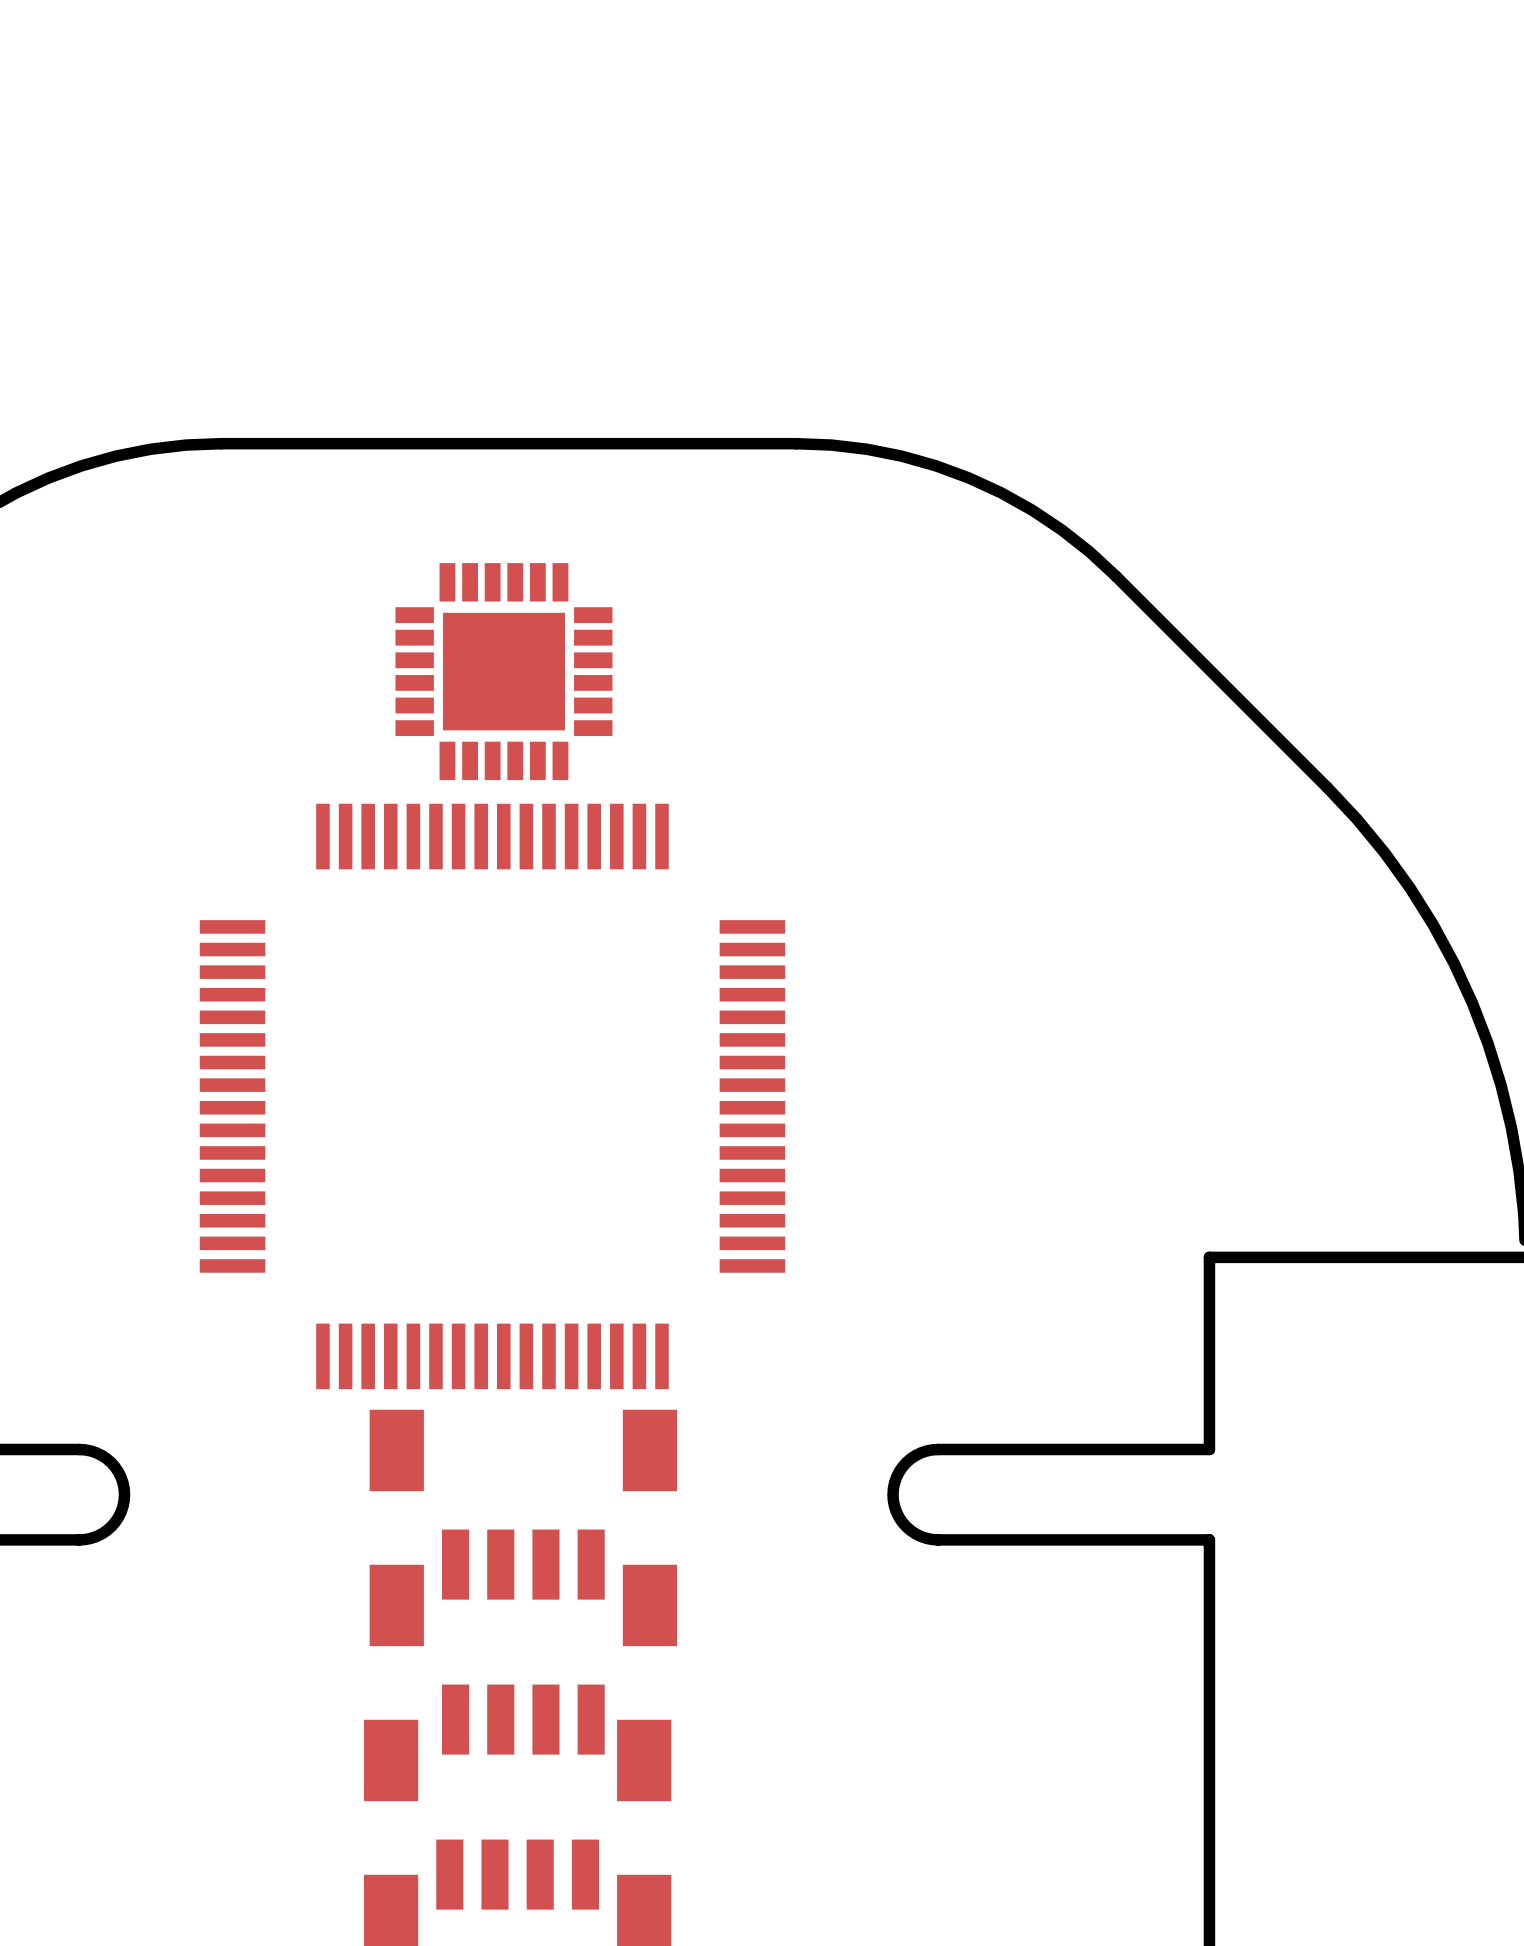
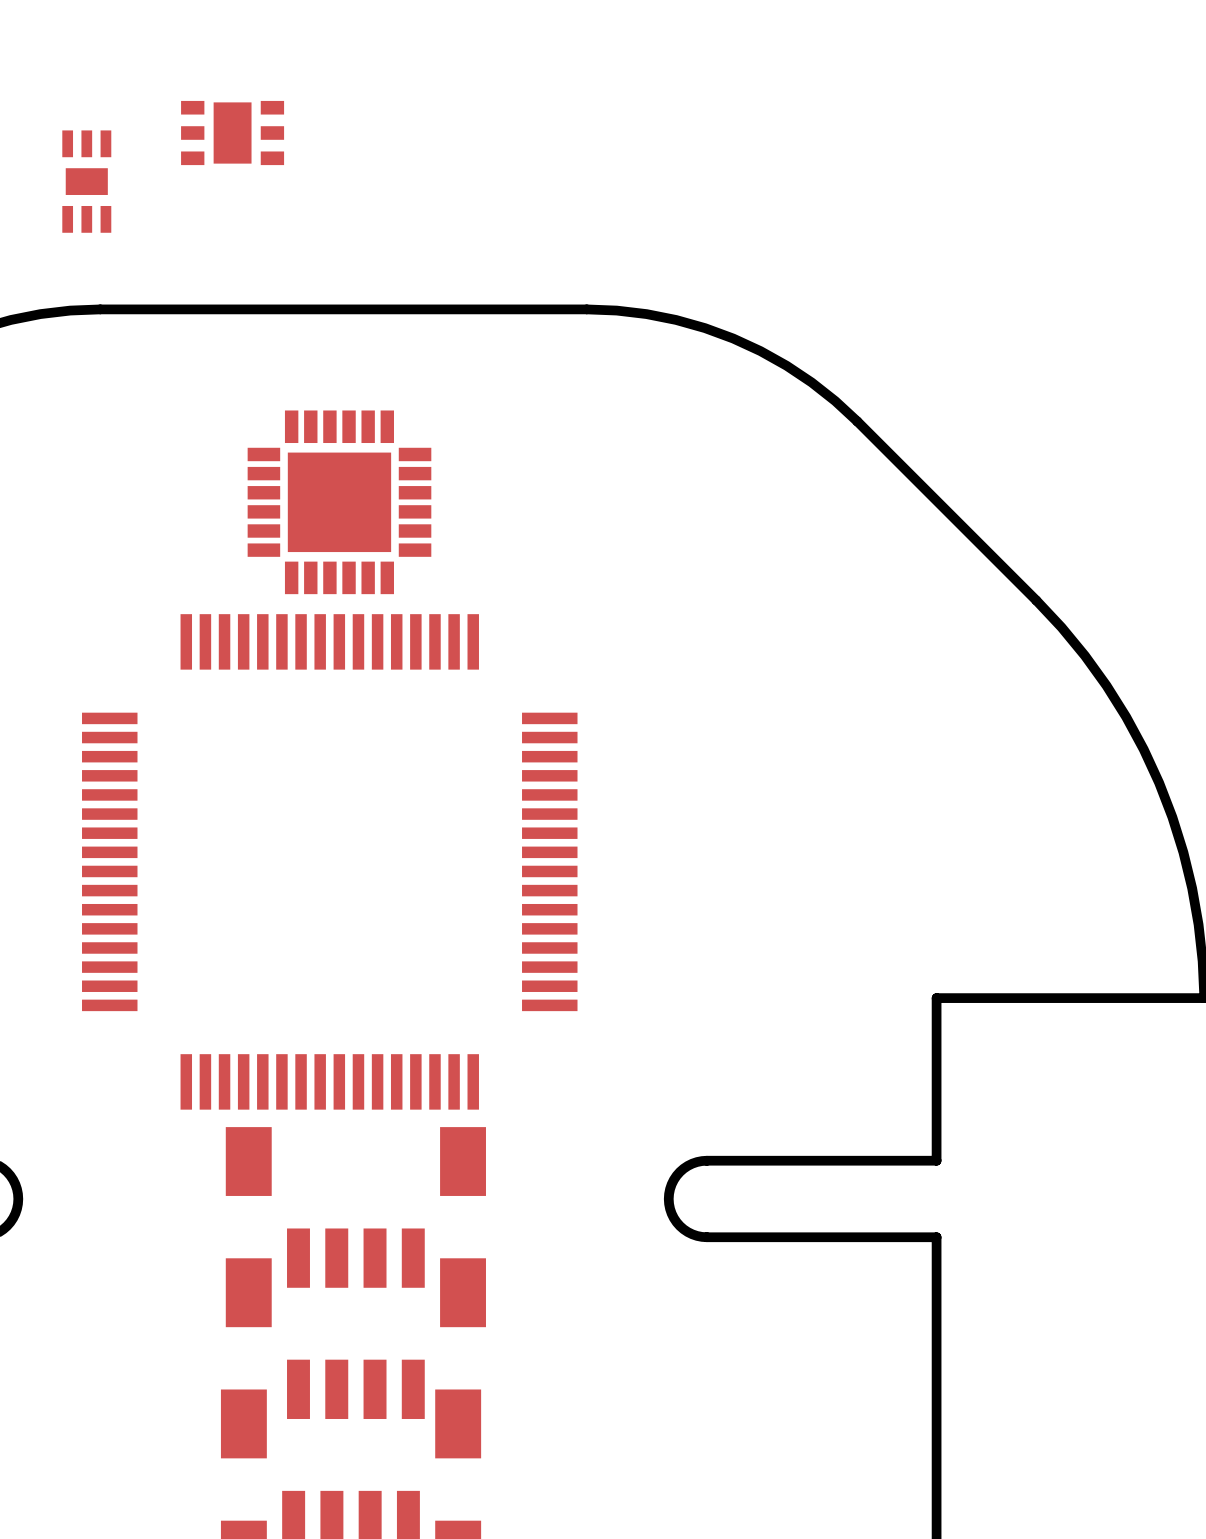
part: none -> (232, 133)
part: none -> (86, 181)

